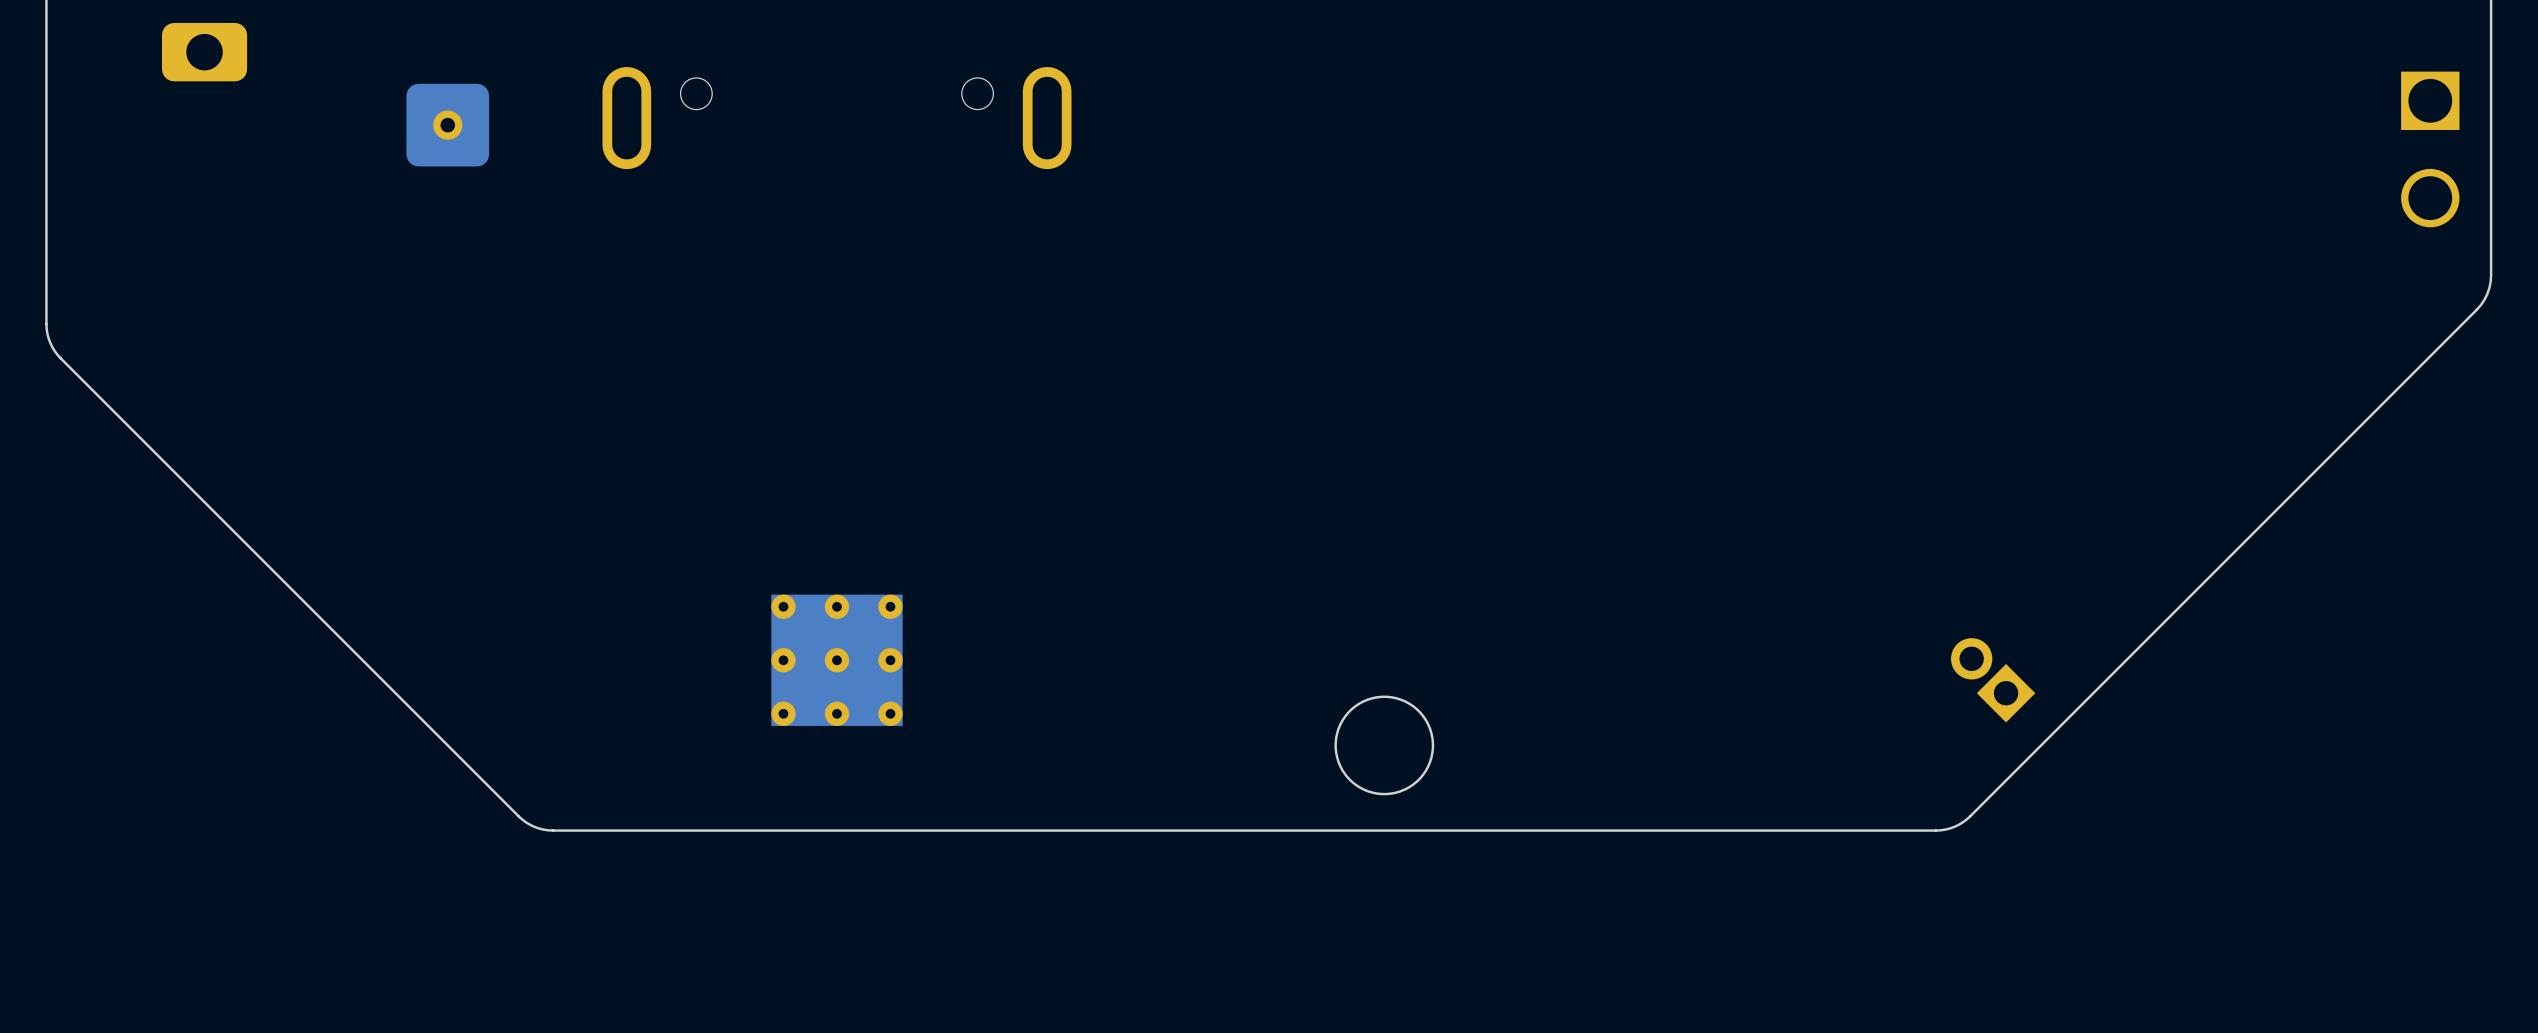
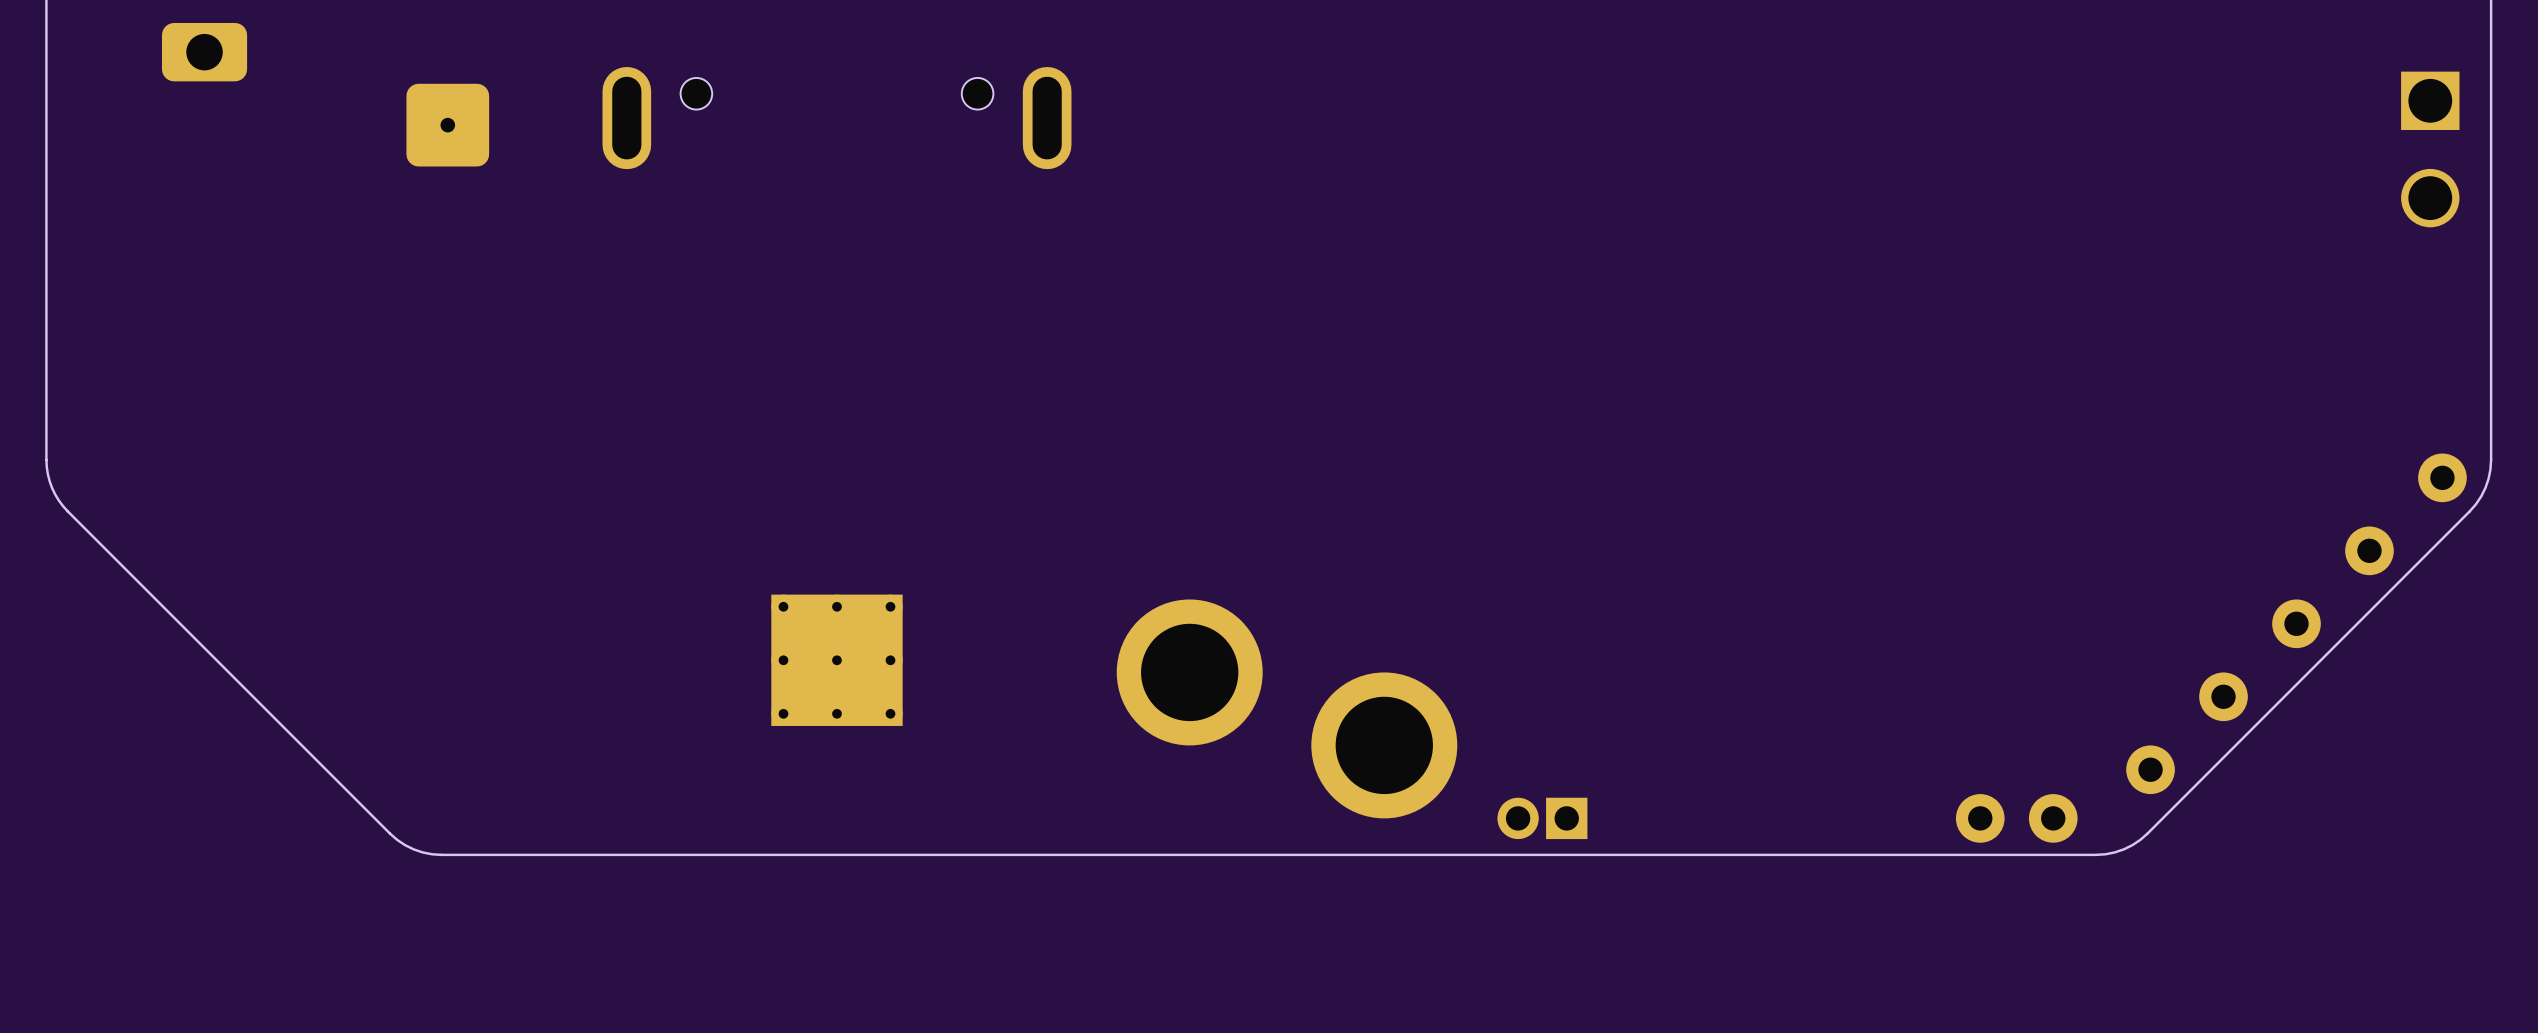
board edge: (2491, 275) (2487, 293) (2476, 309) (1970, 816) (1954, 826) (1935, 830) (553, 830) (538, 828) (518, 816) (60, 358) (50, 342) (46, 323) -> (2491, 275) (2490, 469) (2485, 487) (2476, 504) (2147, 833) (2123, 849) (2095, 854) (441, 854) (422, 852) (405, 845) (389, 833) (58, 500) (51, 487) (46, 466) (46, 323)
part: none -> (2442, 477)
part: none -> (2369, 550)
part: none -> (2296, 623)
part: none -> (1189, 672)
part: (1993, 680) -> none
round board edge: [1334, 695, 1435, 796] -> none
part: none -> (2223, 696)
part: none -> (1384, 745)
part: none -> (2150, 769)
part: none -> (1542, 818)
part: none -> (1980, 818)
part: none -> (2053, 818)

